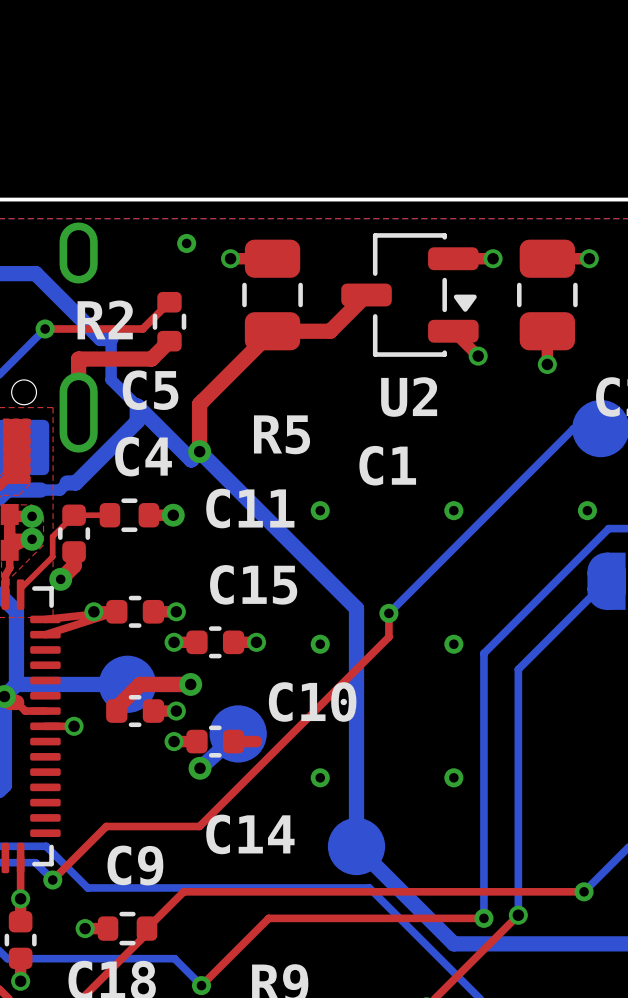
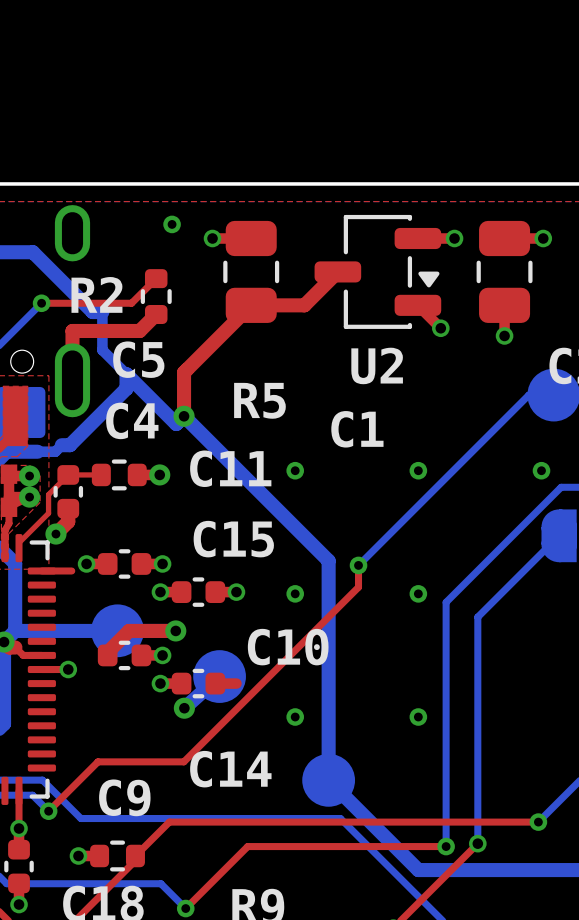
top track: (45, 619) (116, 611) (45, 634) -> (41, 570) (71, 570)

